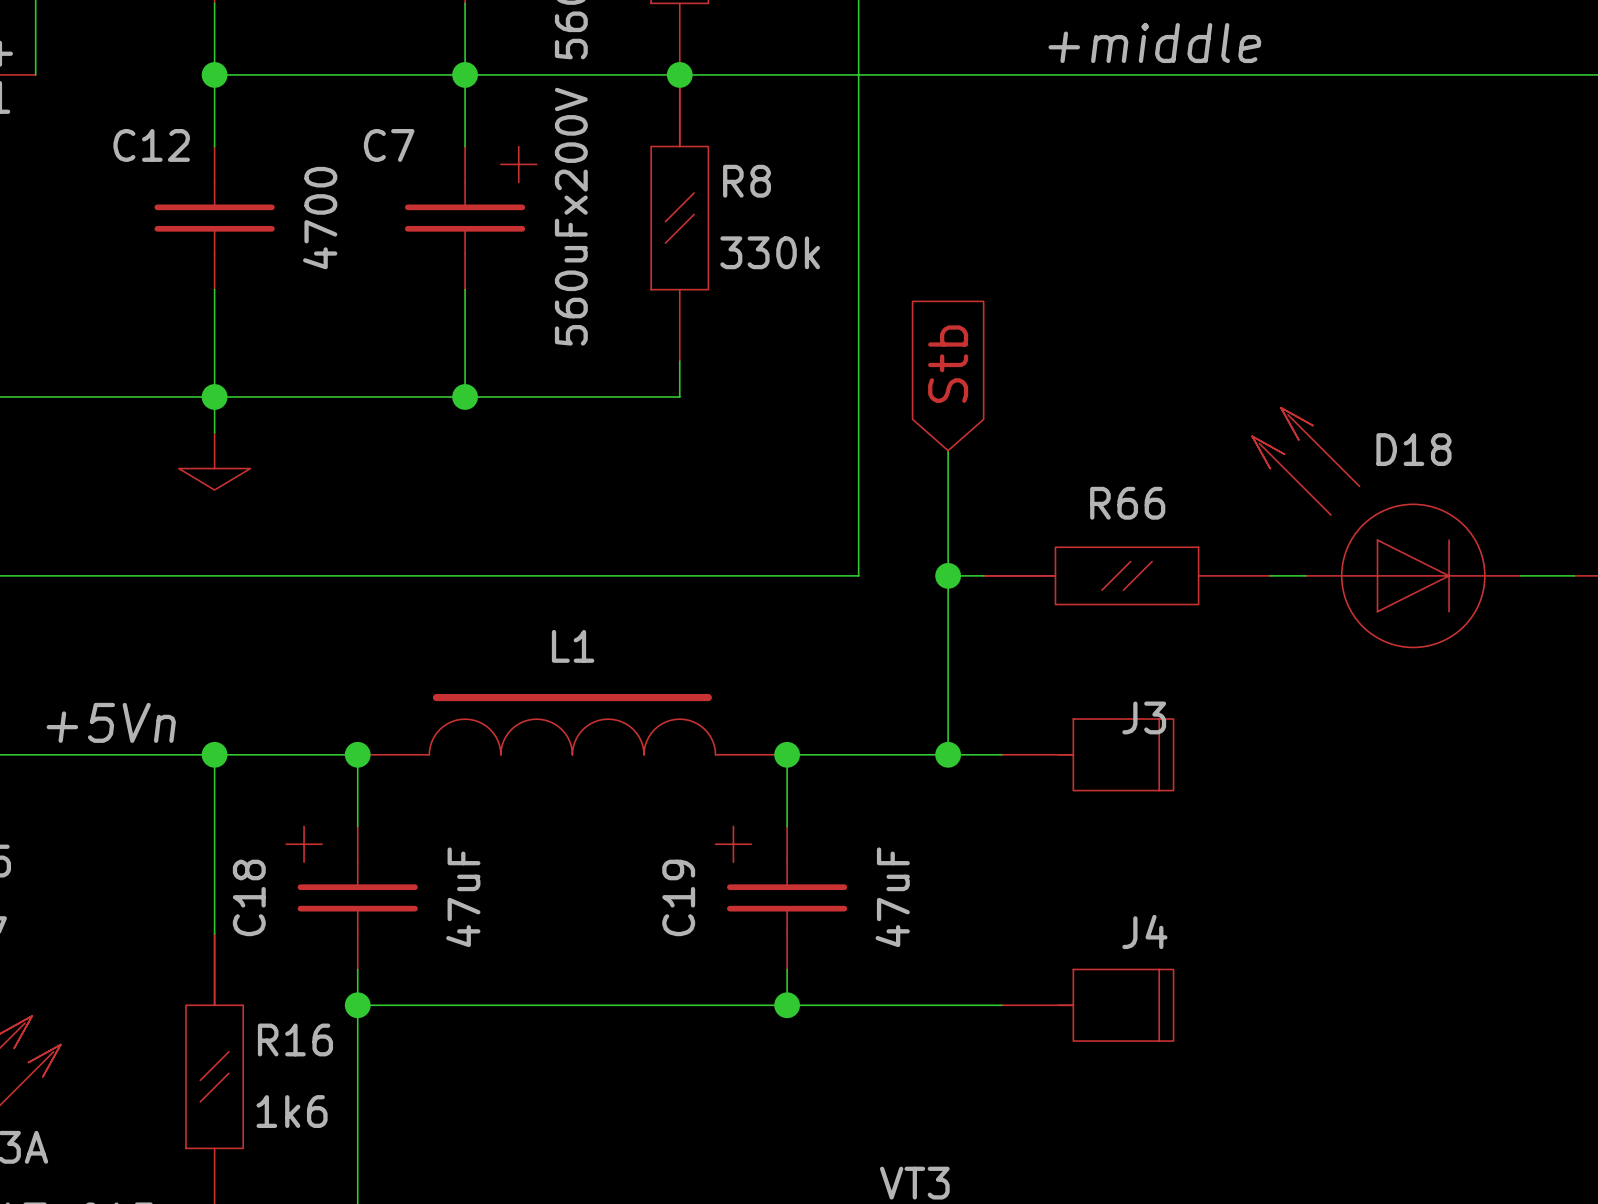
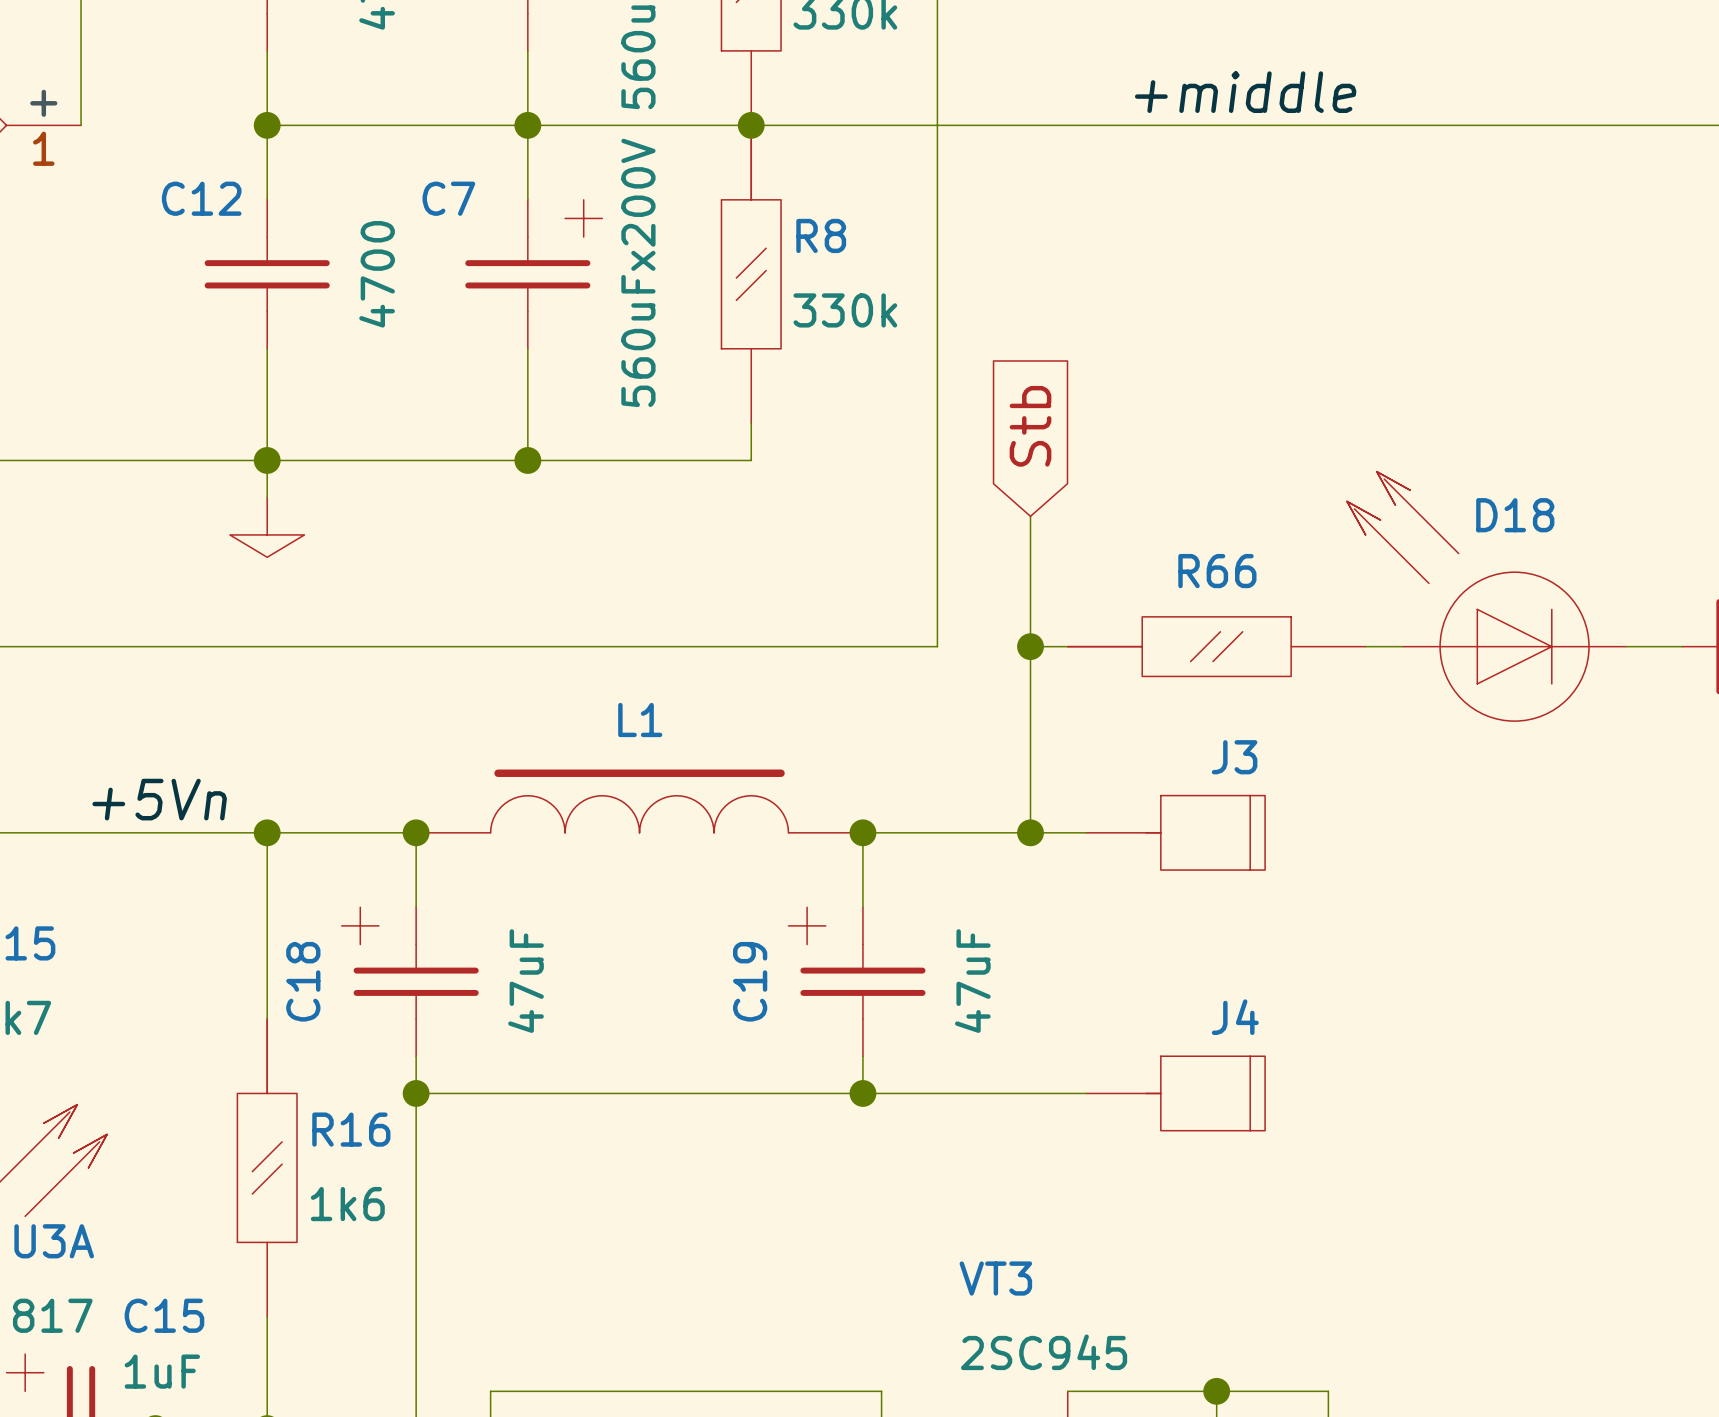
J3 name position: J3 (1144, 717) -> J3 (1234, 757)

